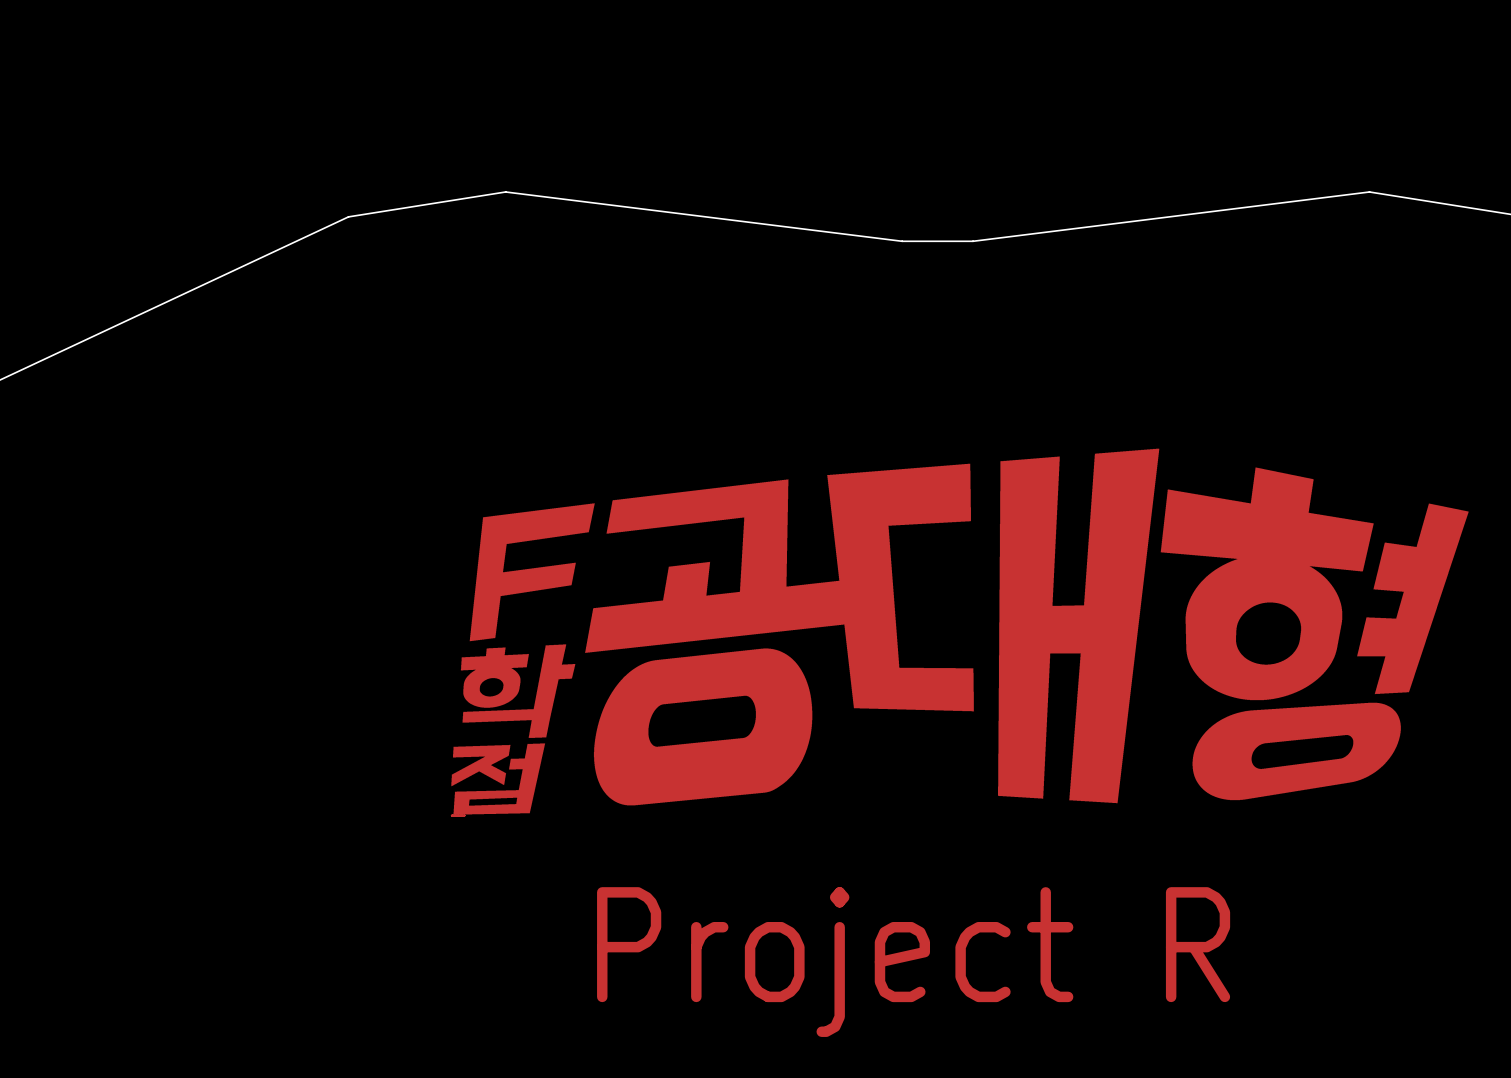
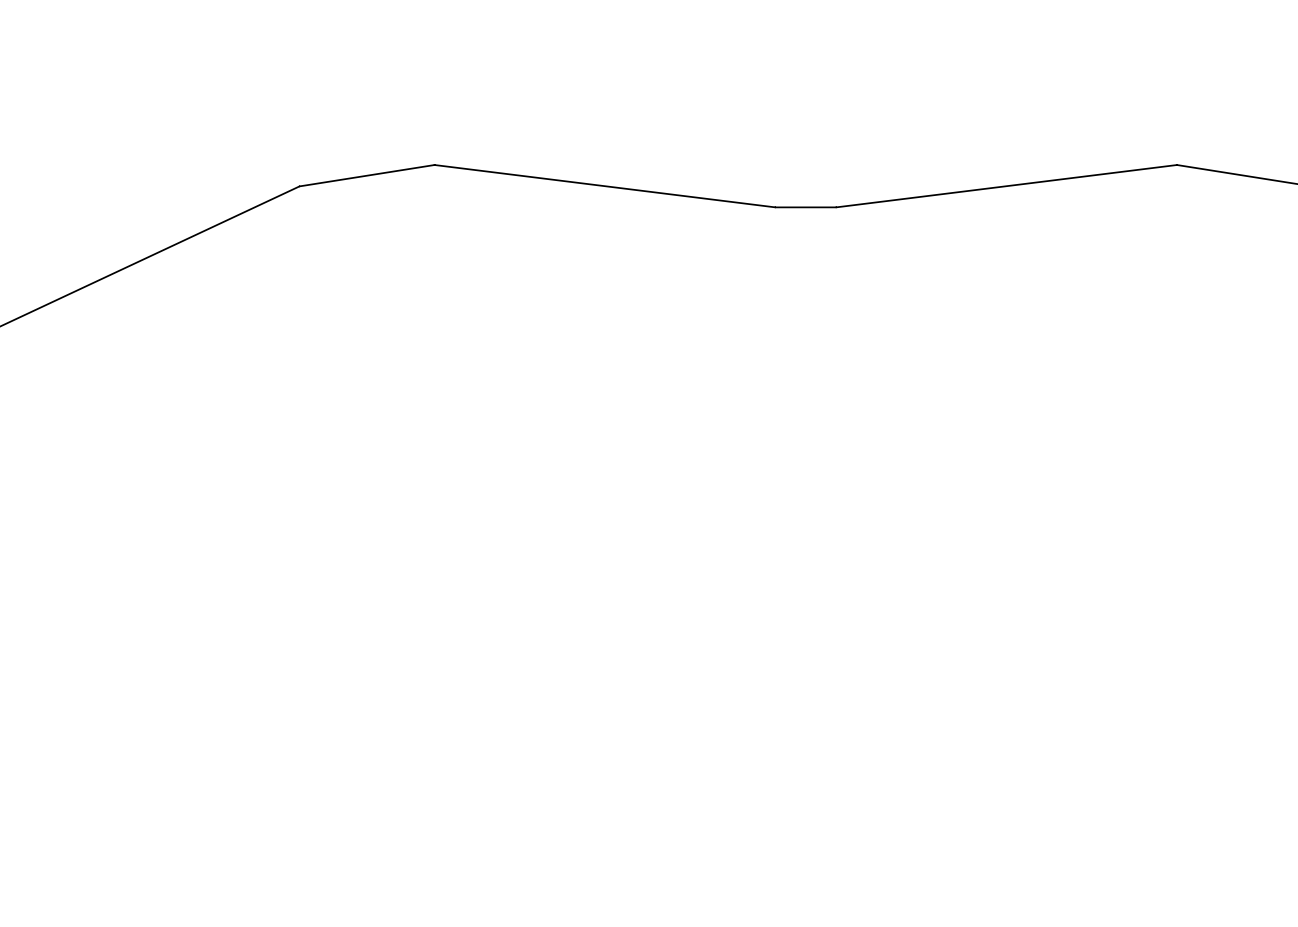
drawing: [451, 448, 1469, 815] -> none
text: Project R (913, 962) -> none

